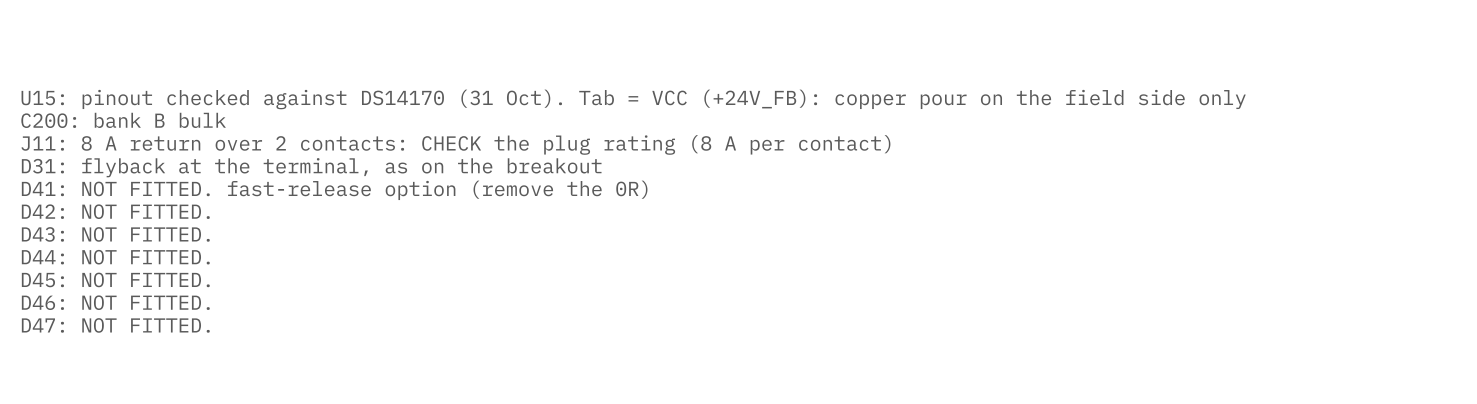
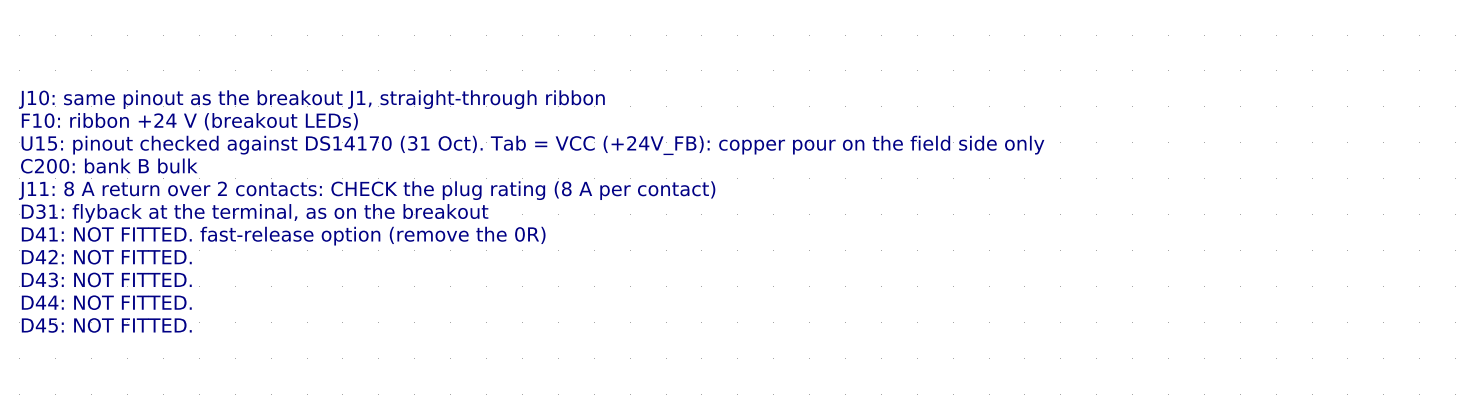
text: U15: pinout checked against DS14170 (31 Oct). Tab = VCC (+24V_FB): copper pour on the field side only (633, 99) -> J10: same pinout as the breakout J1, straight-through ribbon (311, 99)
text: C200: bank B bulk (123, 120) -> F10: ribbon +24 V (breakout LEDs) (189, 121)
text: J11: 8 A return over 2 contacts: CHECK the plug rating (8 A per contact) (455, 144) -> U15: pinout checked against DS14170 (31 Oct). Tab = VCC (+24V_FB): copper pour on the field side only (533, 145)
text: D31: flyback at the terminal, as on the breakout (311, 167) -> C200: bank B bulk (109, 166)
text: D41: NOT FITTED. fast-release option (remove the 0R) (334, 190) -> J11: 8 A return over 2 contacts: CHECK the plug rating (8 A per contact) (367, 190)
text: D42: NOT FITTED. (115, 211) -> D31: flyback at the terminal, as on the breakout (255, 213)
text: D43: NOT FITTED. (115, 234) -> D41: NOT FITTED. fast-release option (remove the 0R) (283, 236)
text: D44: NOT FITTED. (115, 257) -> D42: NOT FITTED. (106, 257)
text: D45: NOT FITTED. (115, 279) -> D43: NOT FITTED. (106, 279)
text: D46: NOT FITTED. (115, 302) -> D44: NOT FITTED. (106, 302)
text: D47: NOT FITTED. (115, 325) -> D45: NOT FITTED. (106, 325)

